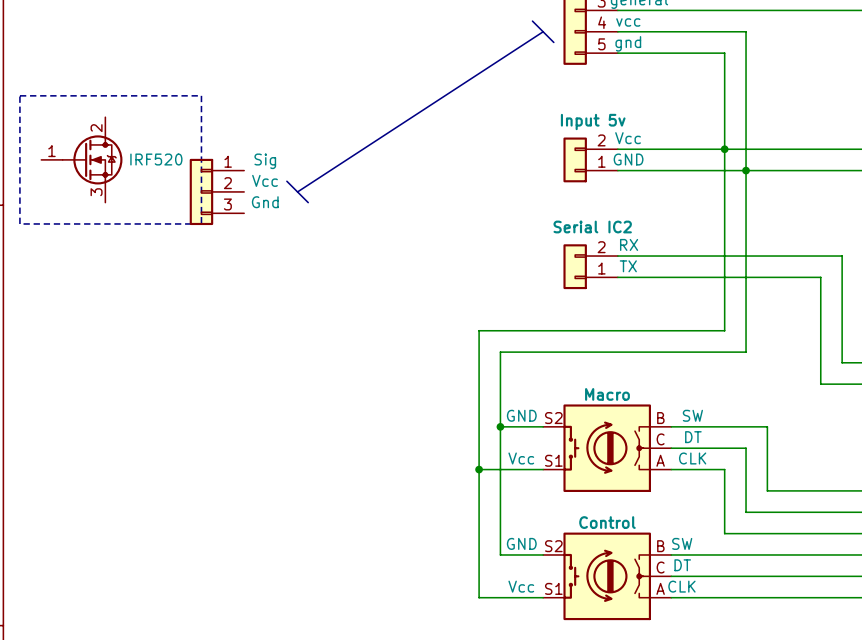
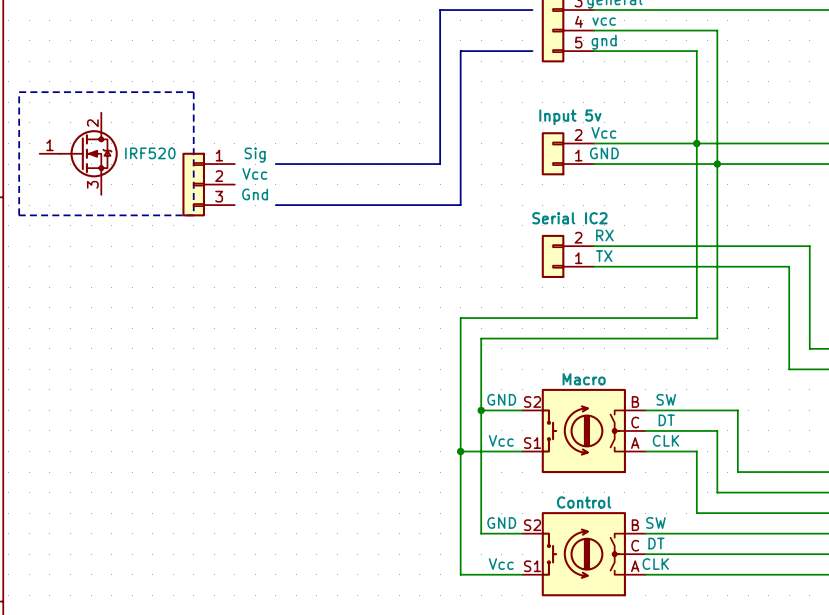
bus: none -> (532, 10) (440, 10) (440, 164) (275, 164)
bus: (532, 21) (553, 42) -> none
bus: (543, 31) (297, 191) -> none
bus: none -> (532, 51) (460, 51) (460, 205) (275, 205)
bus: (286, 181) (308, 202) -> none

